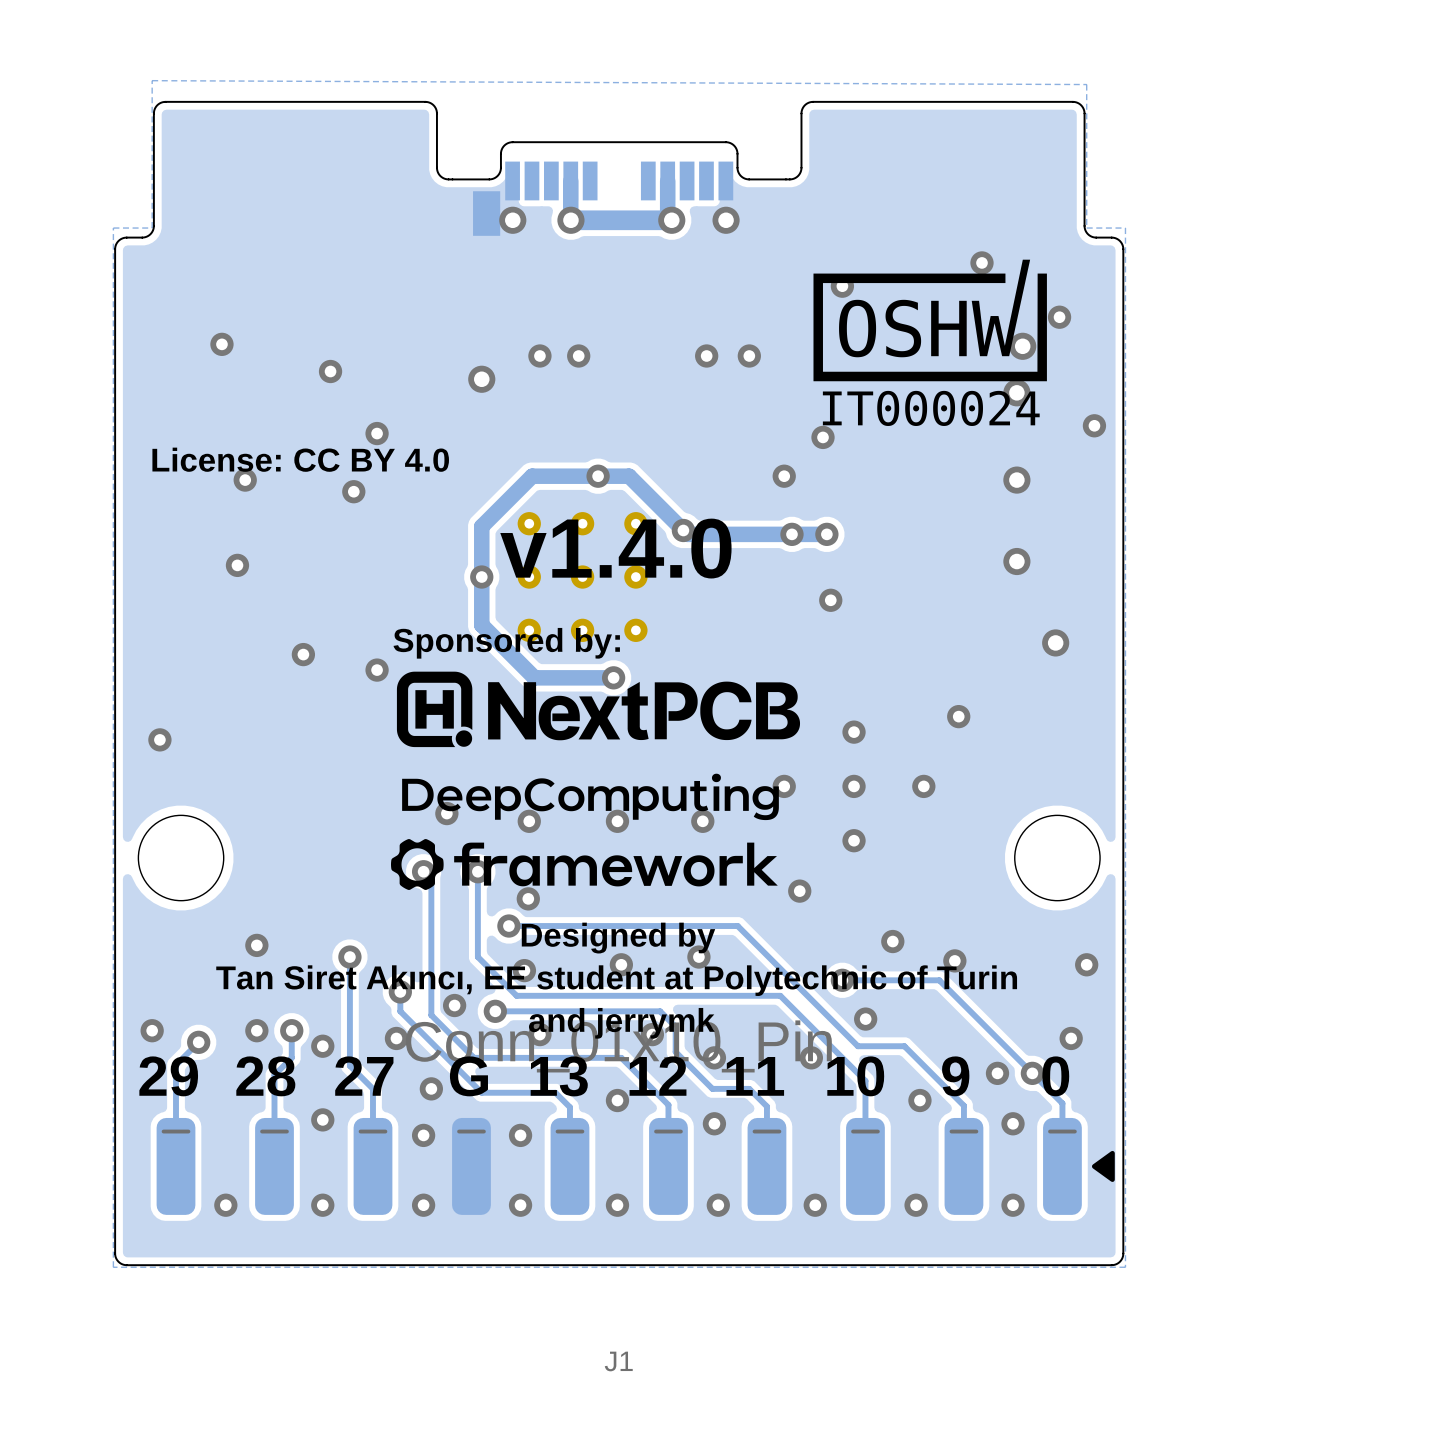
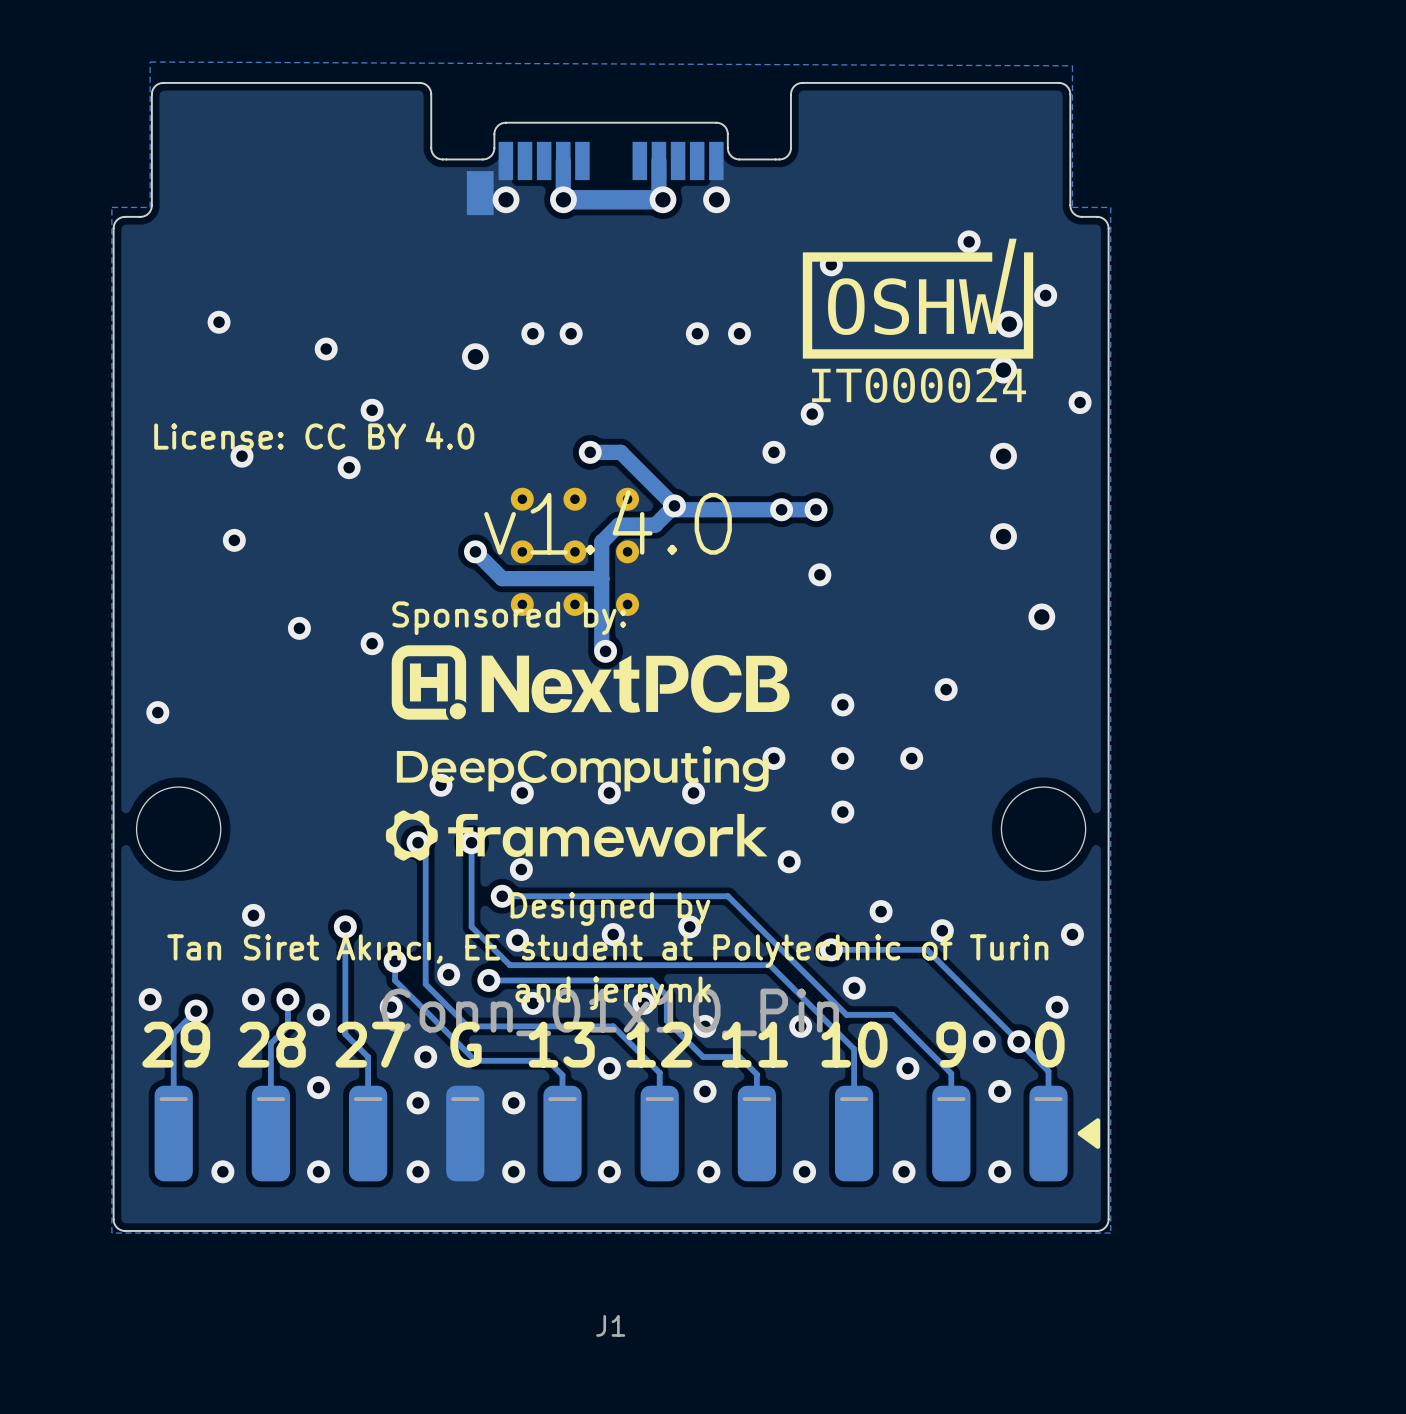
track: (598, 476) (532, 476) (481, 526) (481, 625) (534, 677) (613, 677) -> (674, 505) (655, 525) (618, 525) (601, 542) (601, 647) (605, 651)
track: none -> (475, 551) (502, 578) (601, 578)

